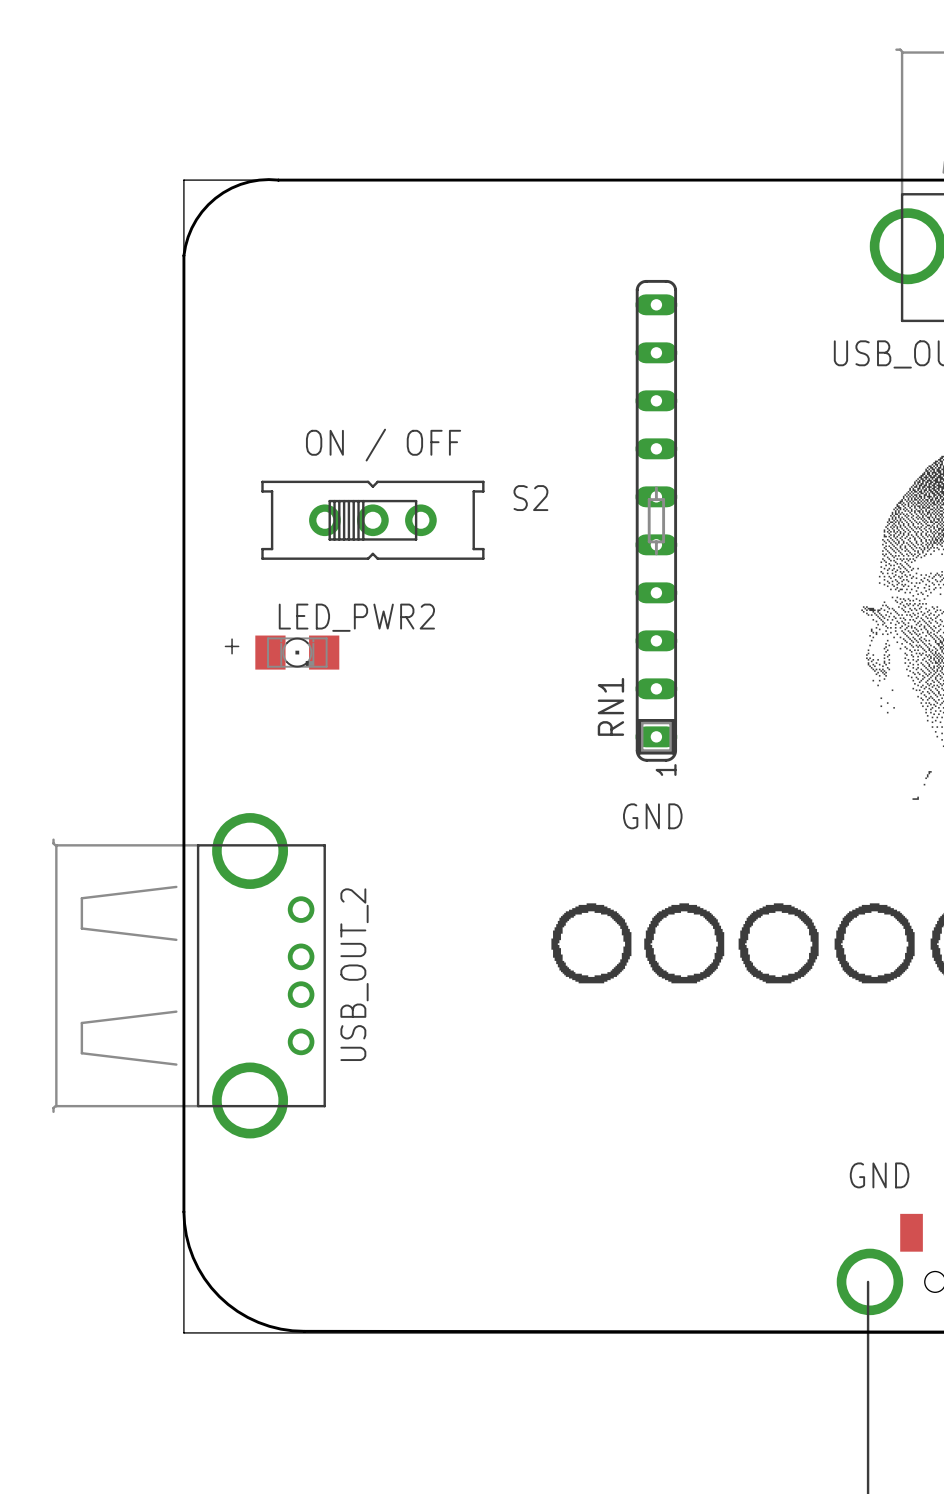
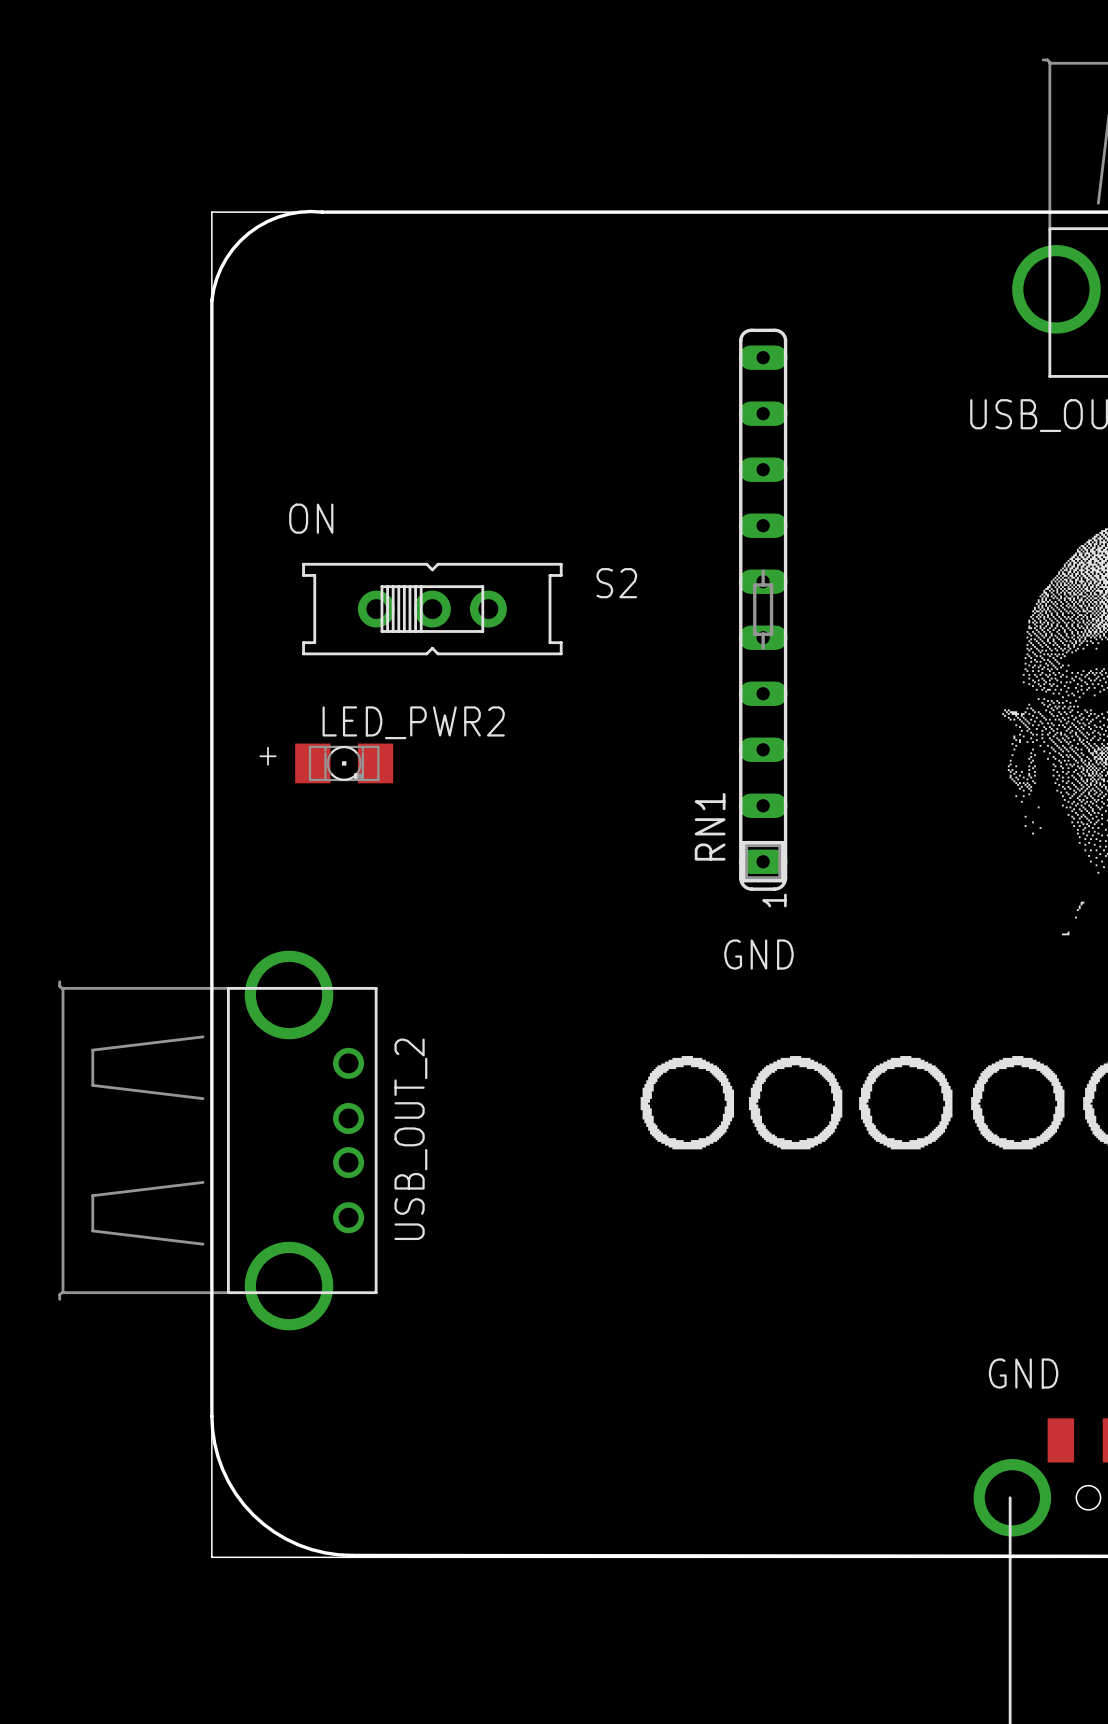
text: none -> ON (311, 518)
text: ON / OFF (383, 445) -> none

